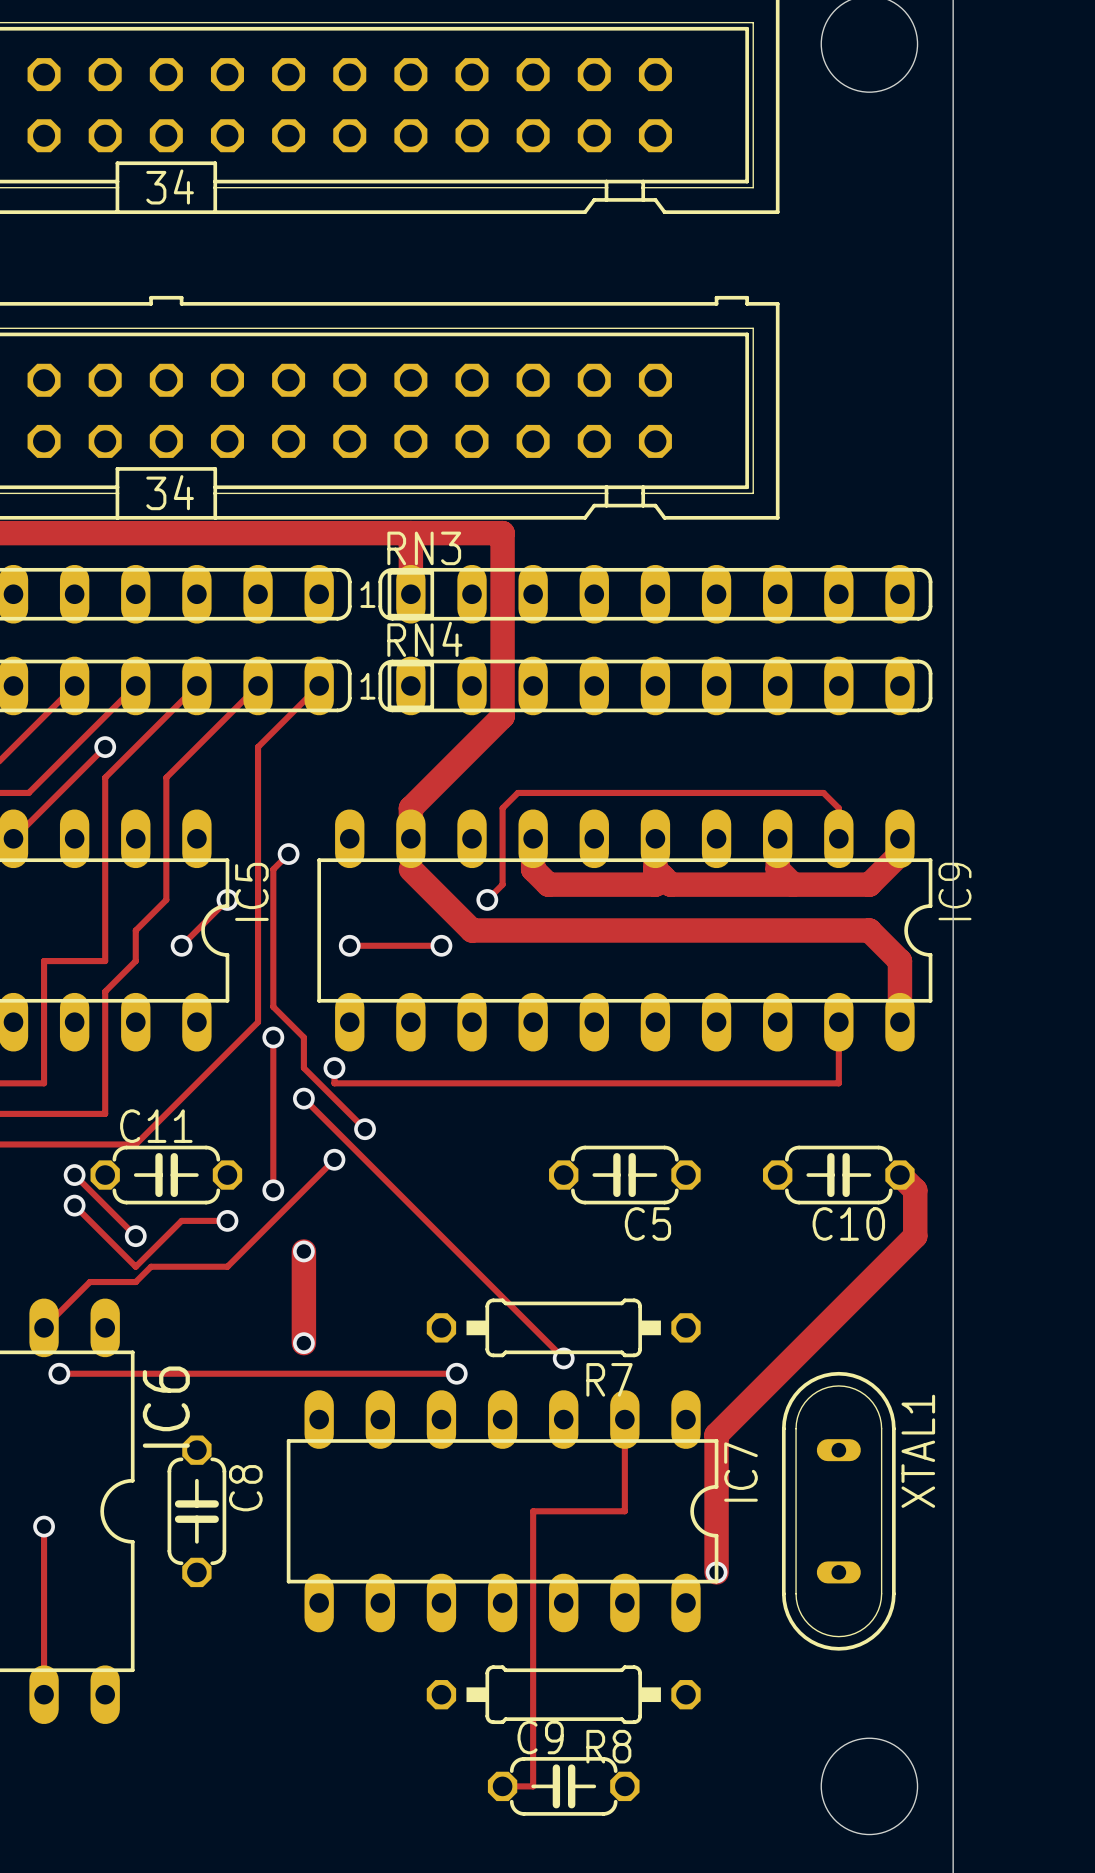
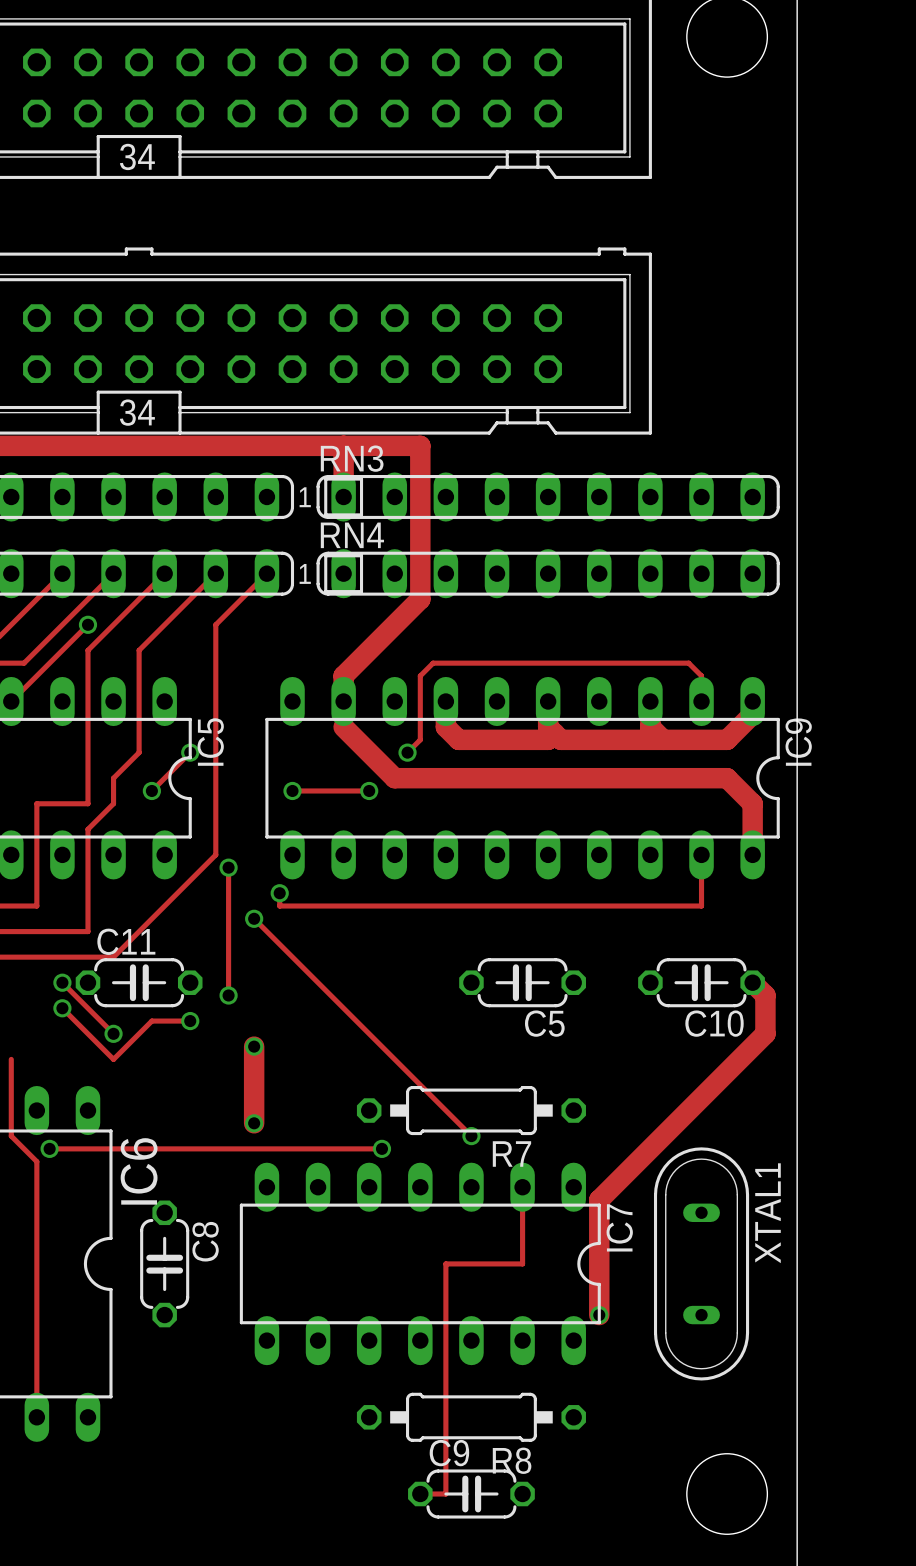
track: (288, 854) (273, 869) (273, 1006) (303, 1037) (303, 1068) (365, 1129) -> none
via: (288, 854) -> none
via: (365, 1129) -> none
track: (334, 1159) (227, 1266) (151, 1266) (135, 1282) (89, 1282) (44, 1327) -> none
via: (334, 1159) -> none
track: none -> (11, 1059) (11, 1136) (36, 1161) (36, 1276)
via: (44, 1526) -> none

